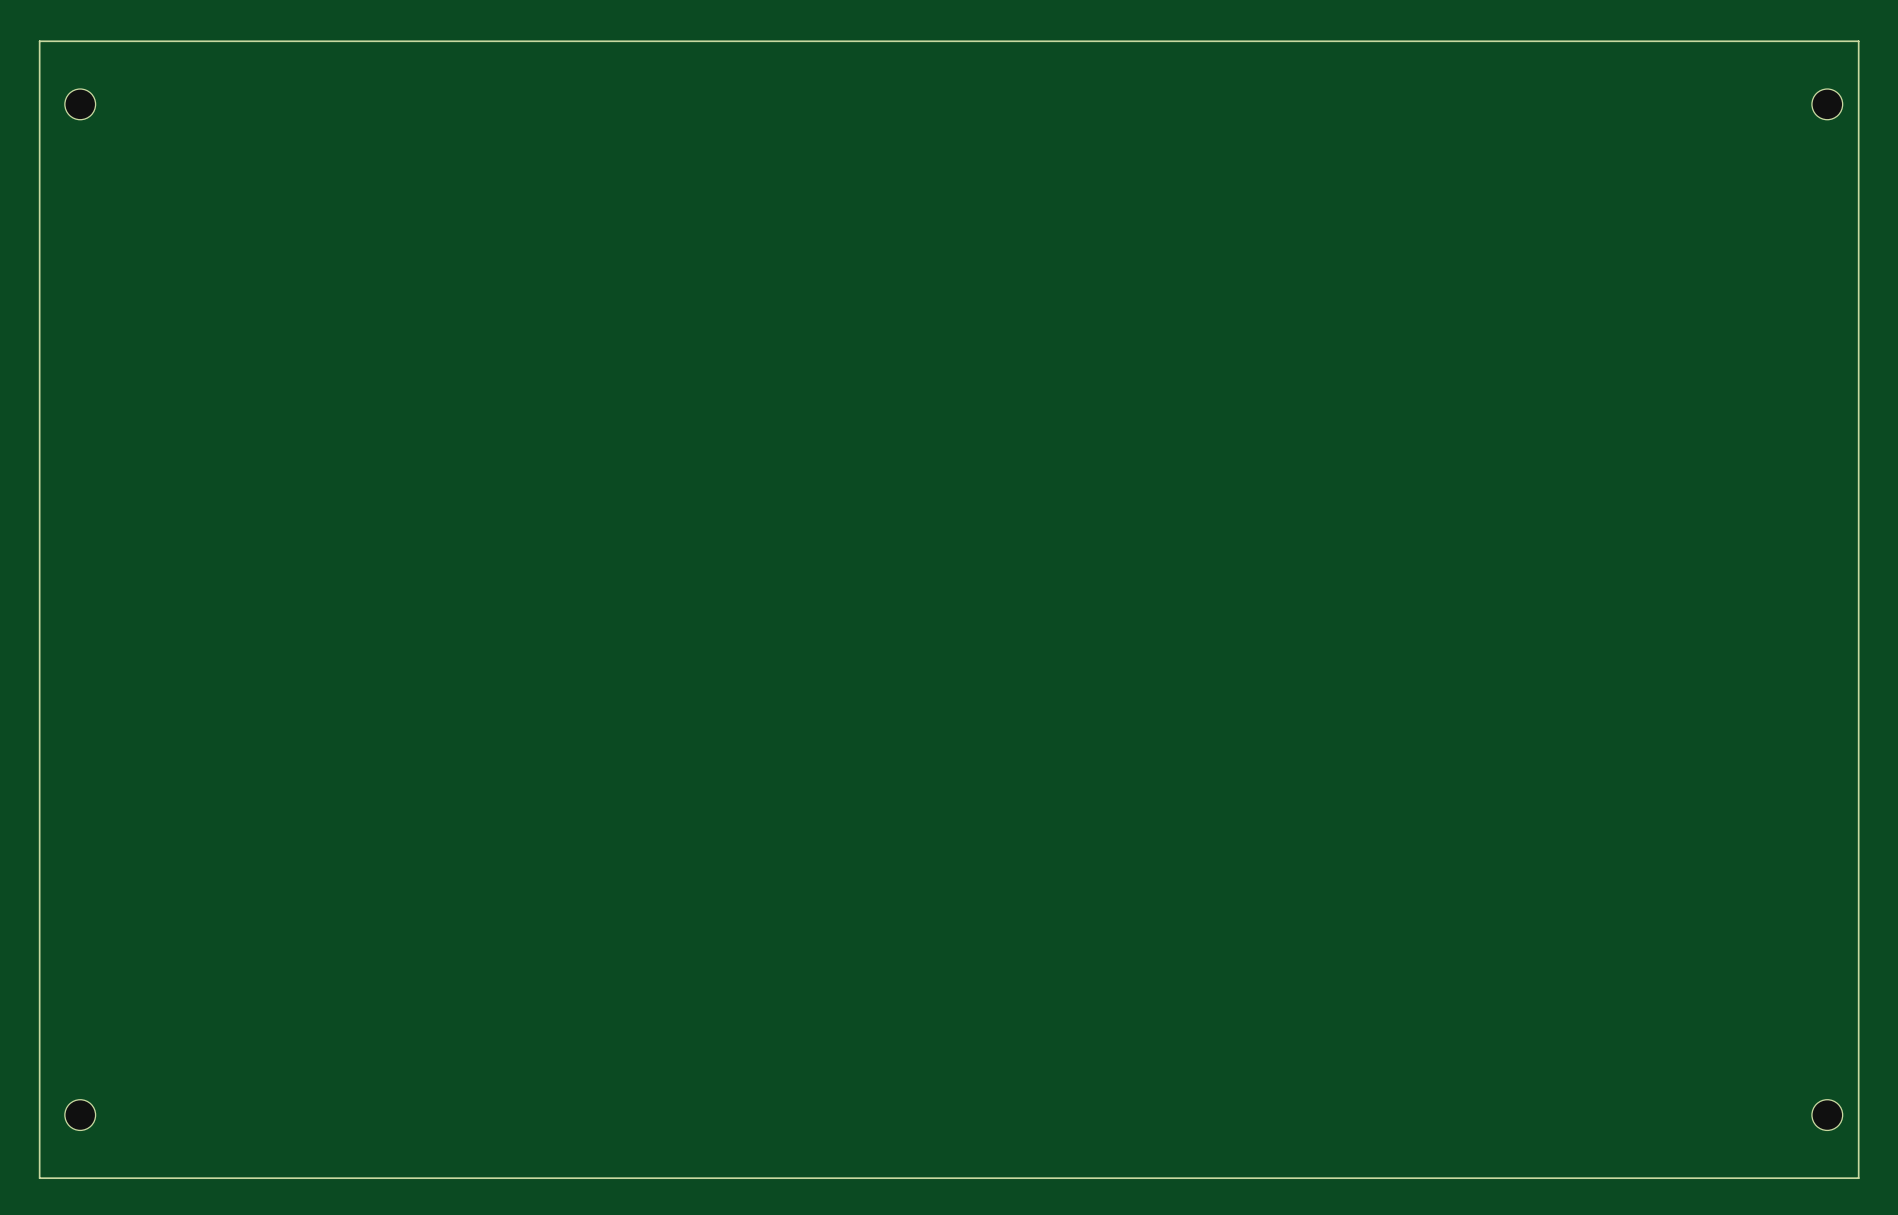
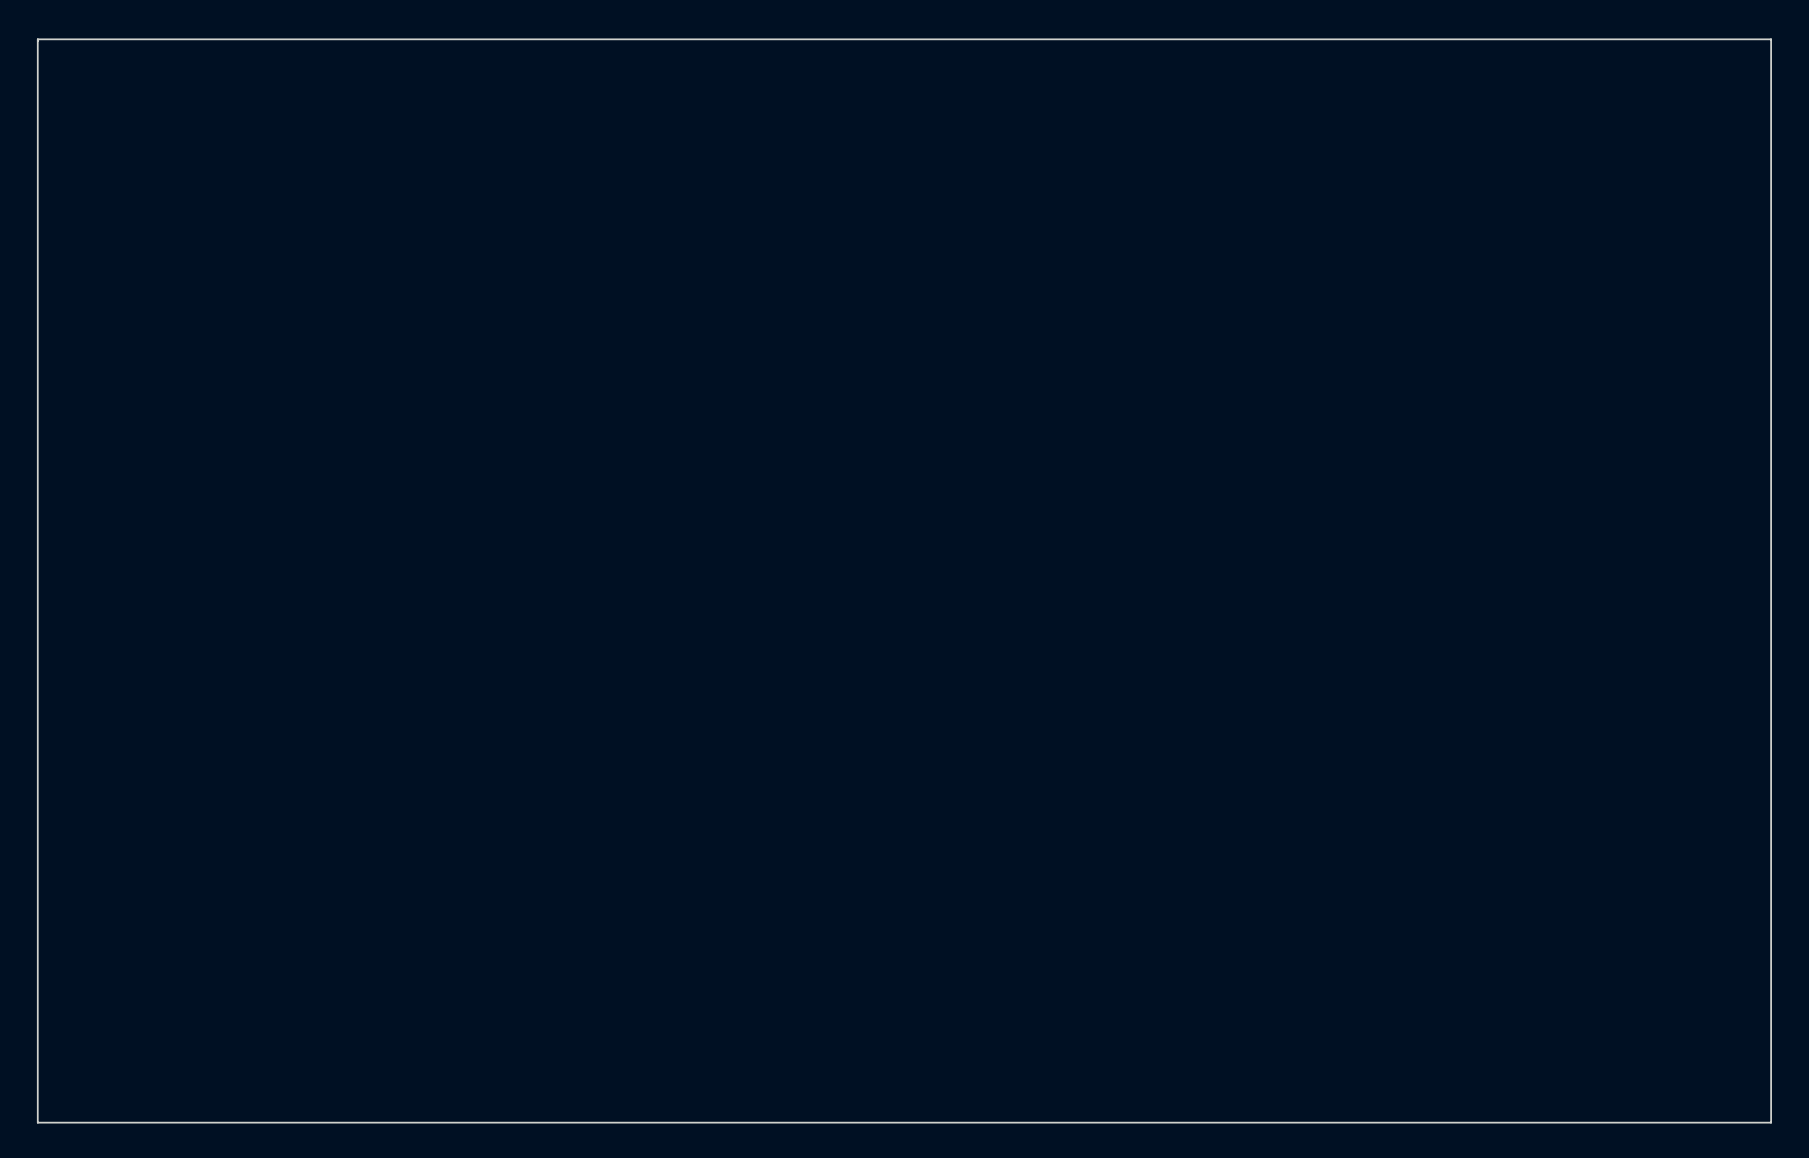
part: (80, 104) -> none
part: (1827, 104) -> none
part: (80, 1115) -> none
part: (1827, 1115) -> none

